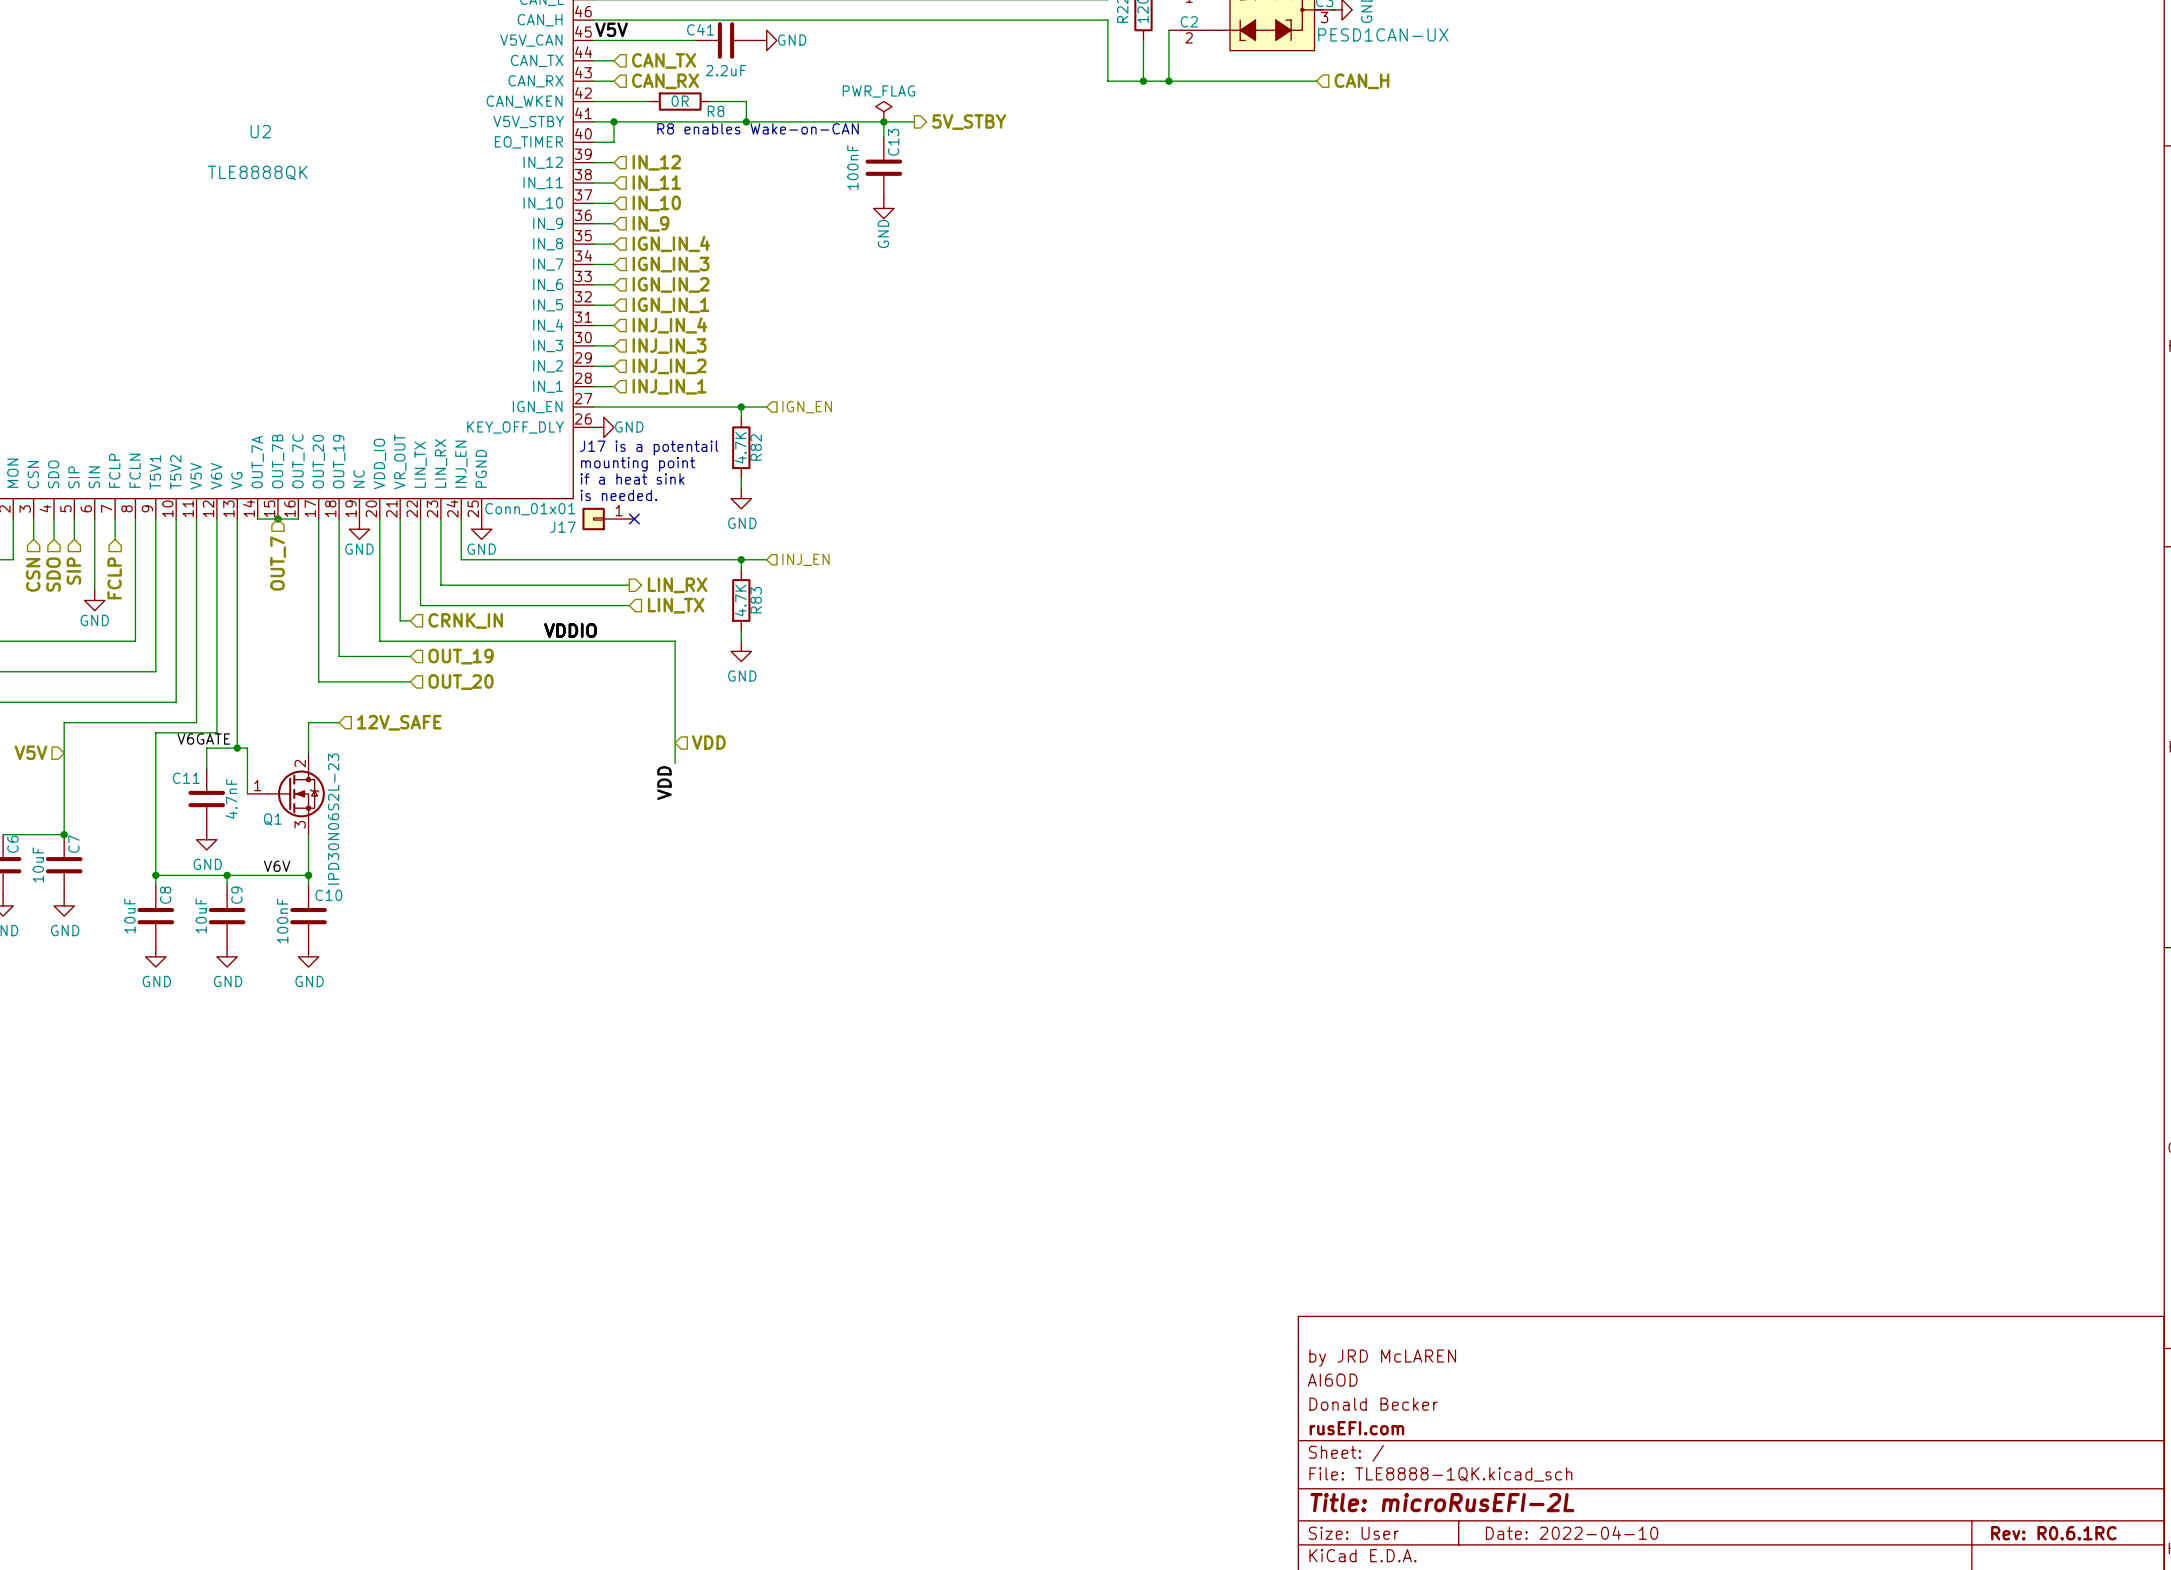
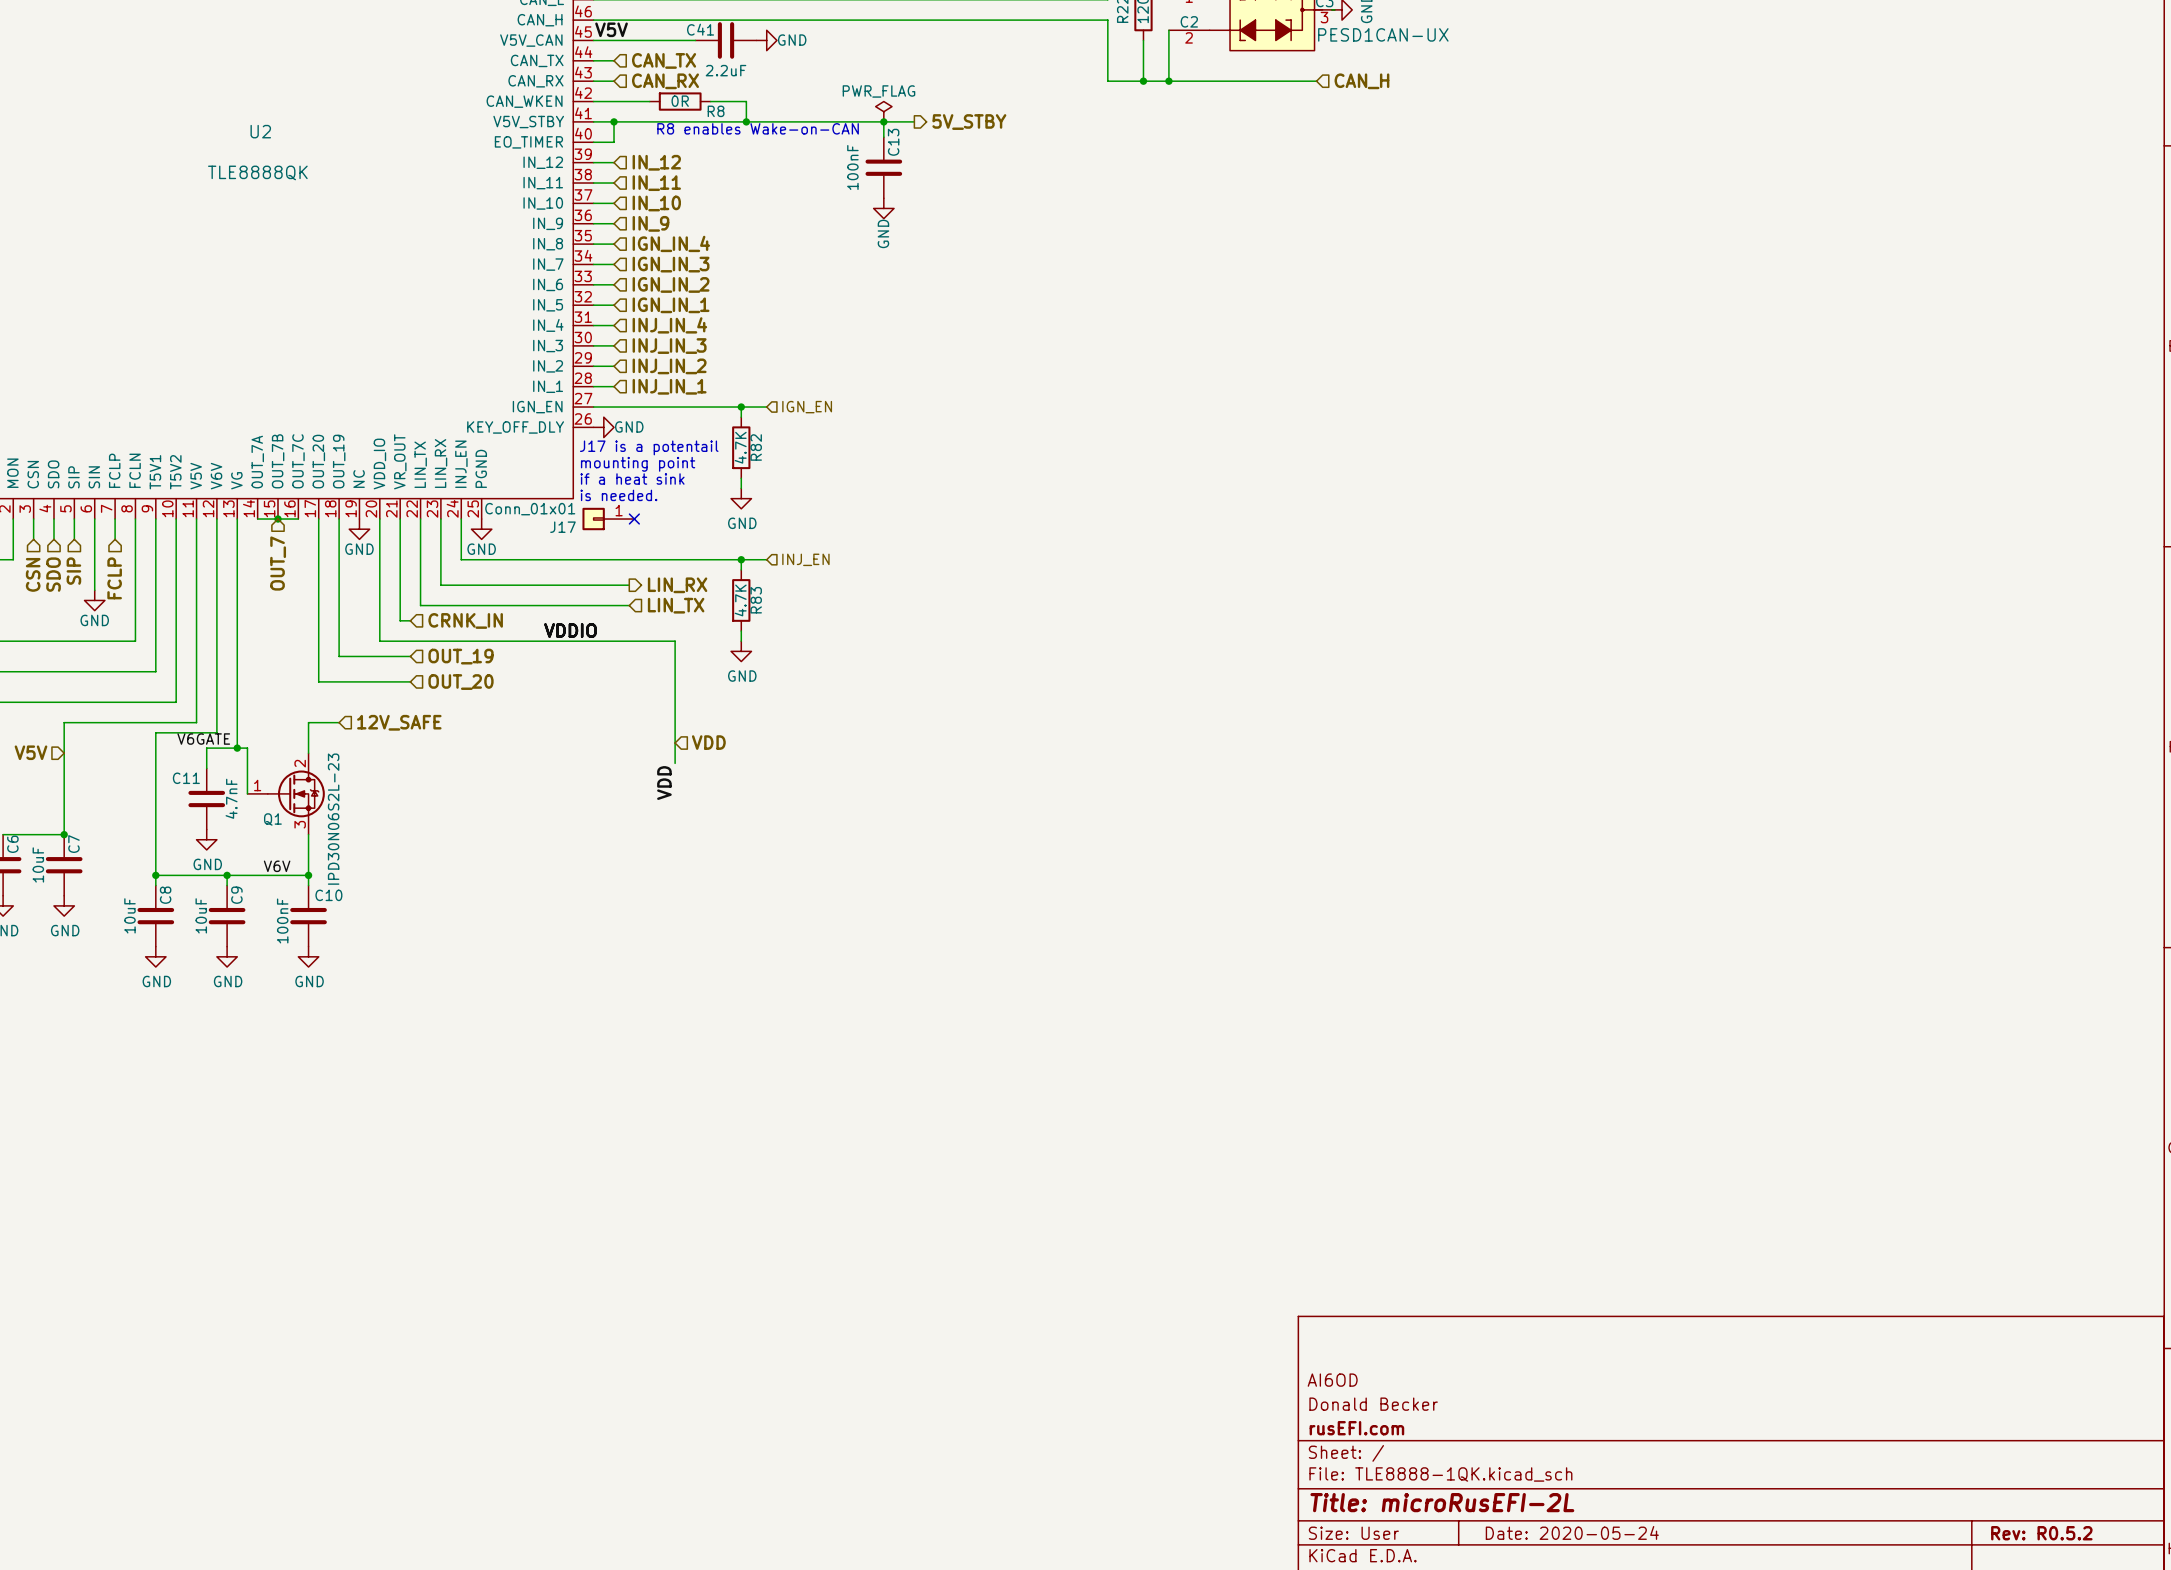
title block: by JRD McLAREN (1382, 1358) -> none
title block: Date: 2022-04-10 (1572, 1532) -> Date: 2020-05-24 (1572, 1532)
title block: Rev: R0.6.1RC (2053, 1533) -> Rev: R0.5.2 (2041, 1533)

